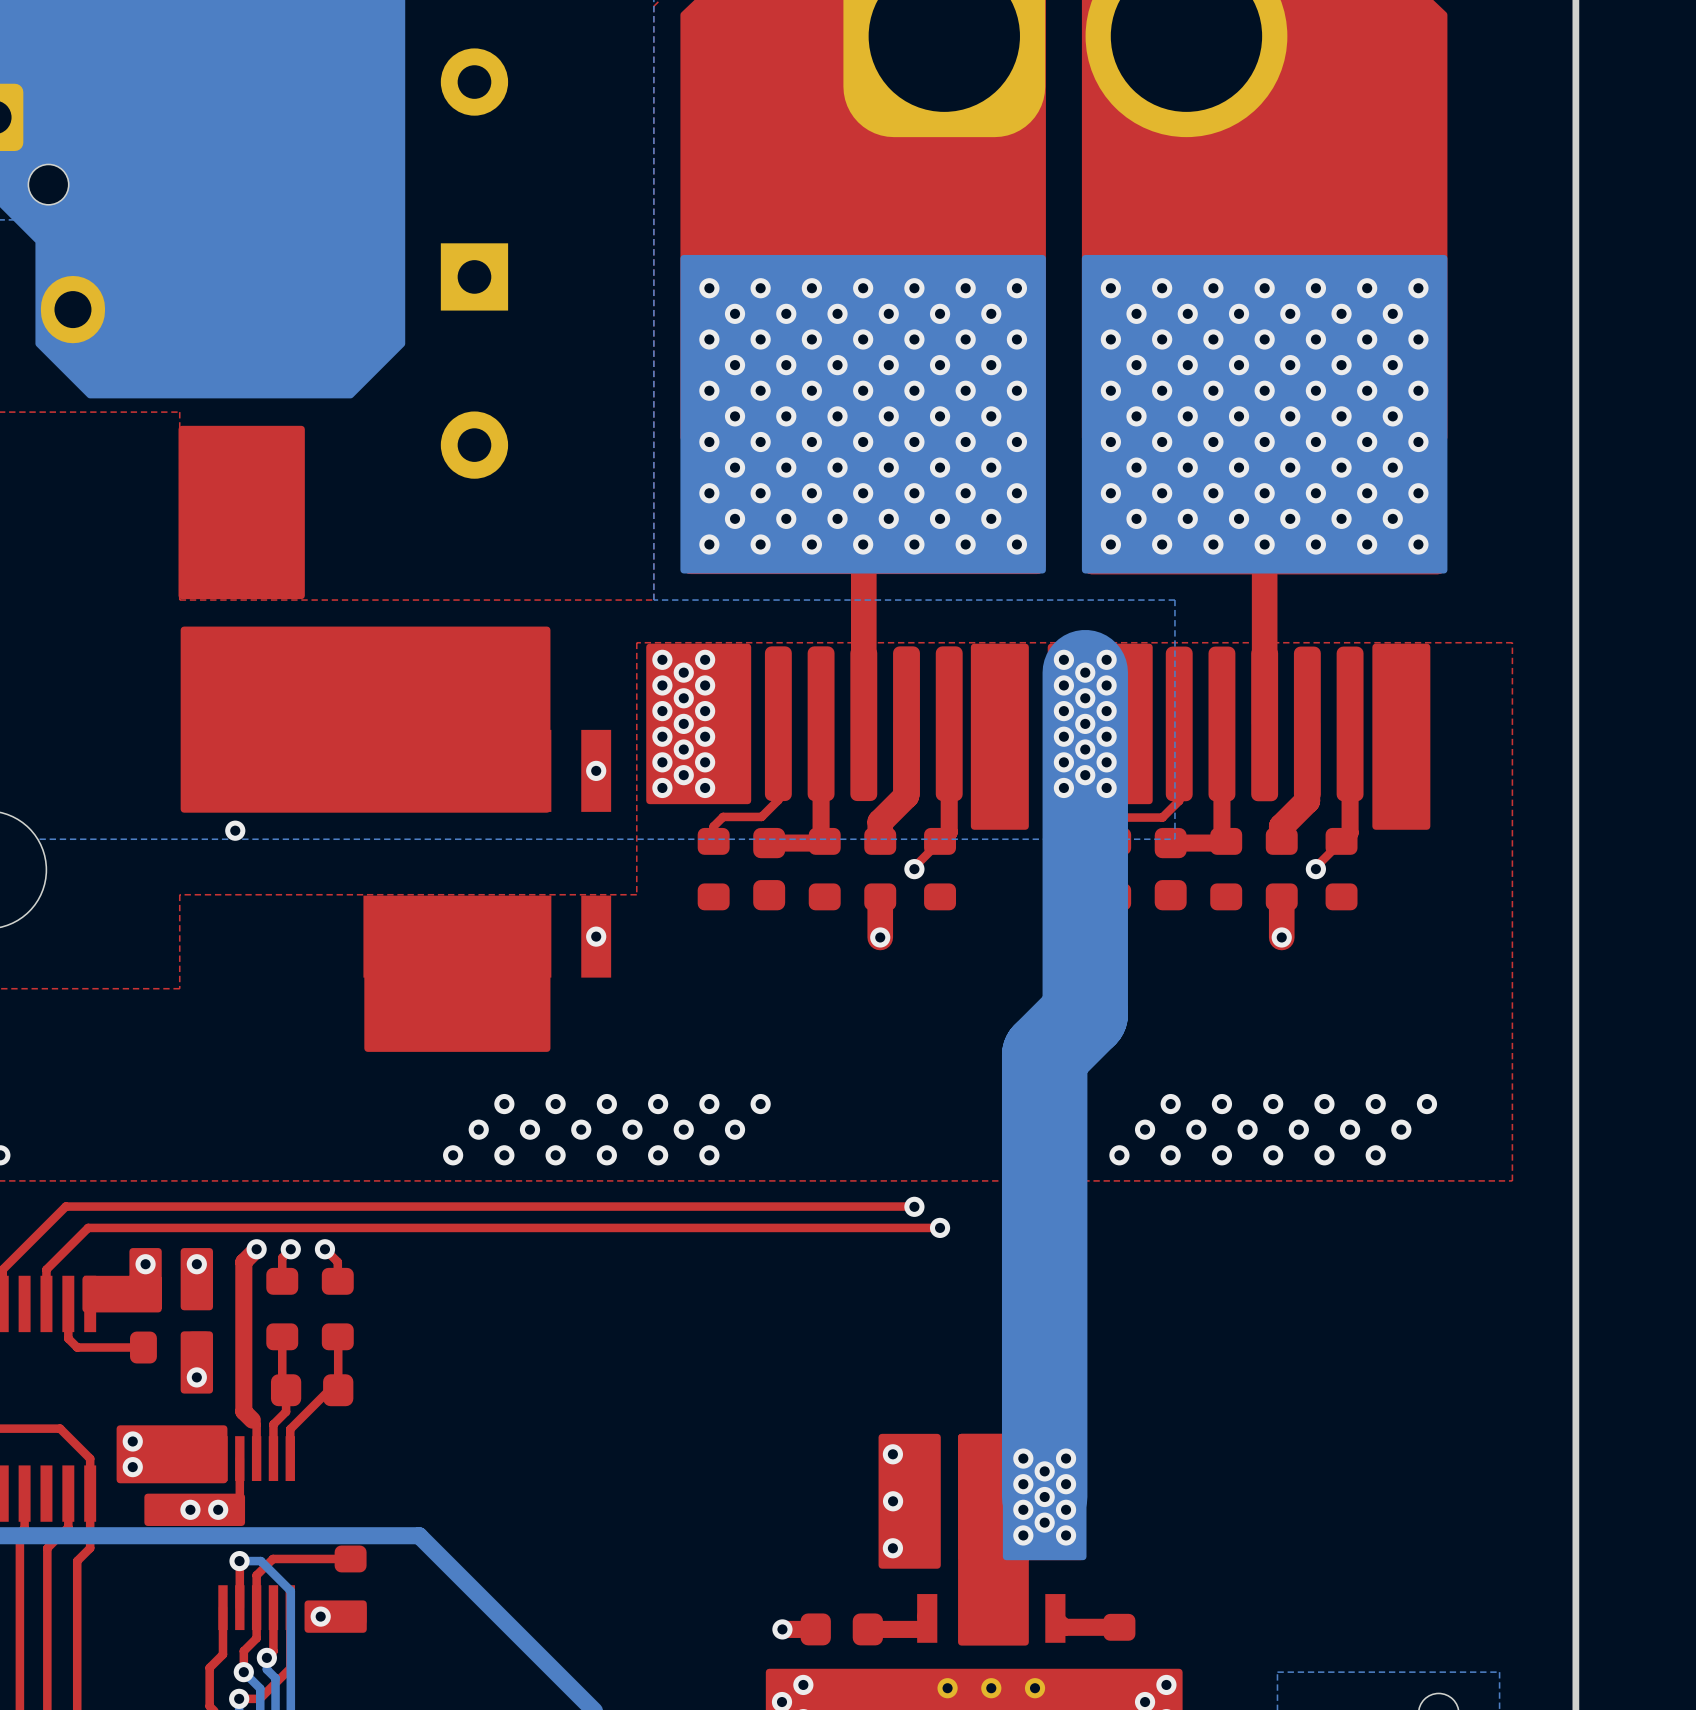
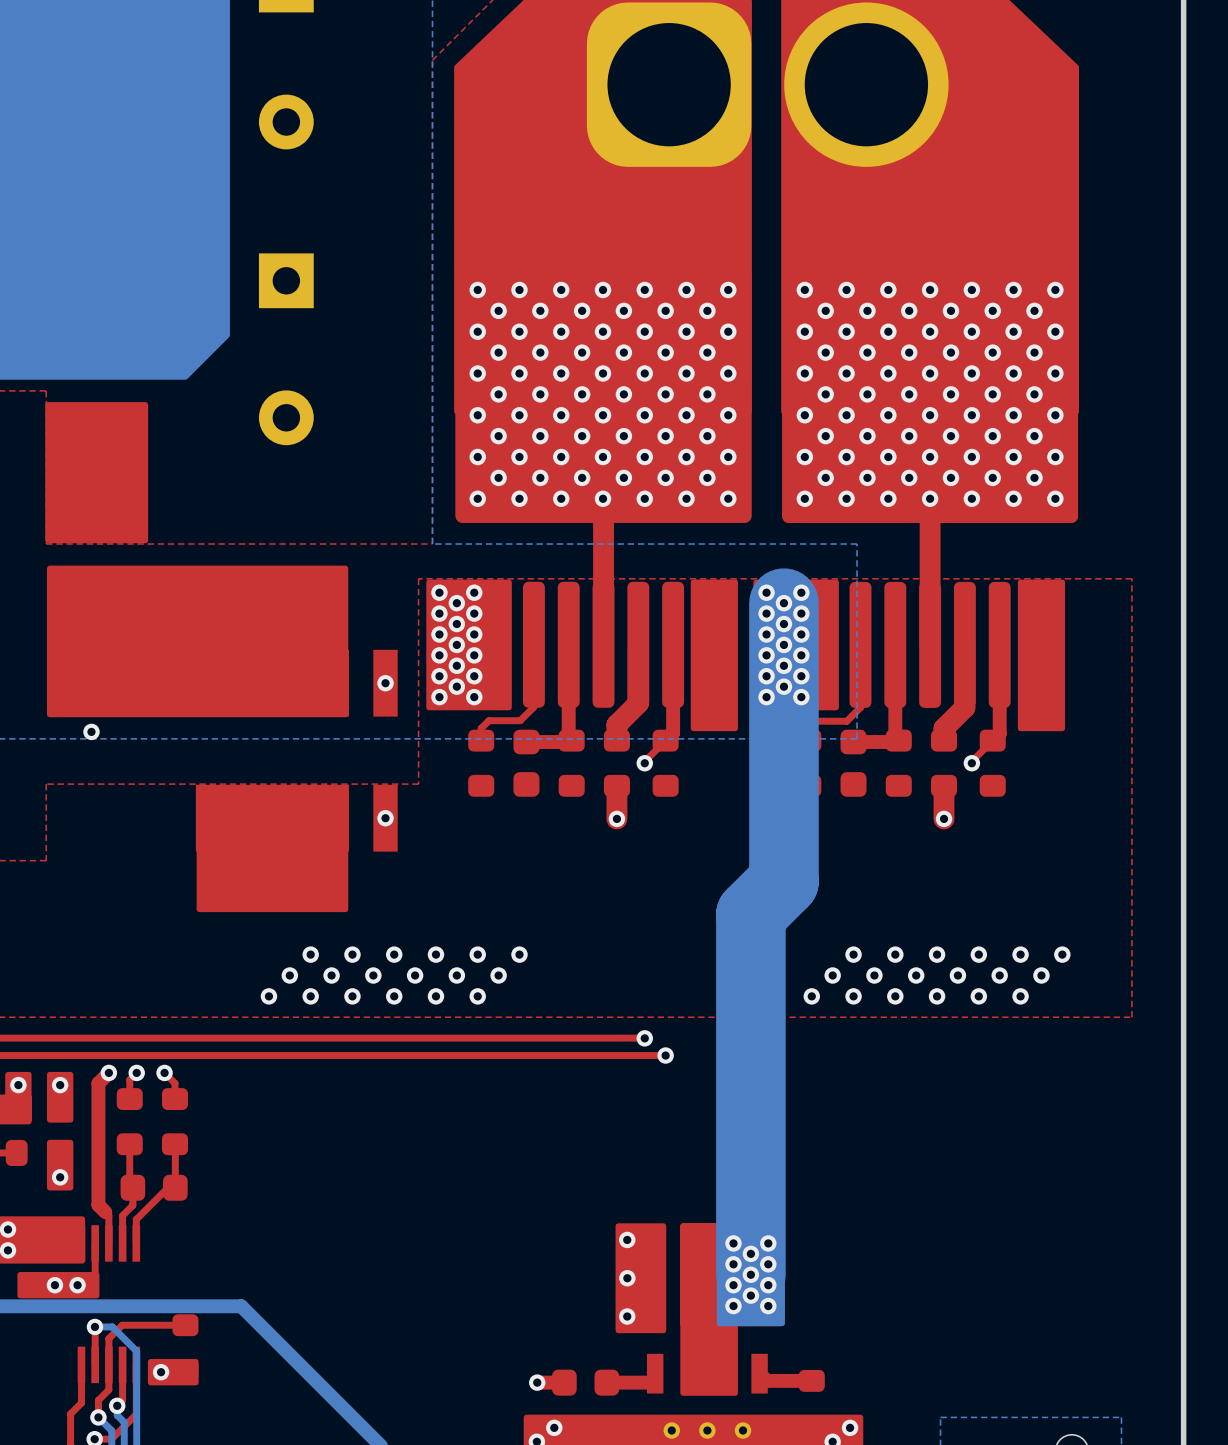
drawing: [680, 254, 1448, 574] -> none

